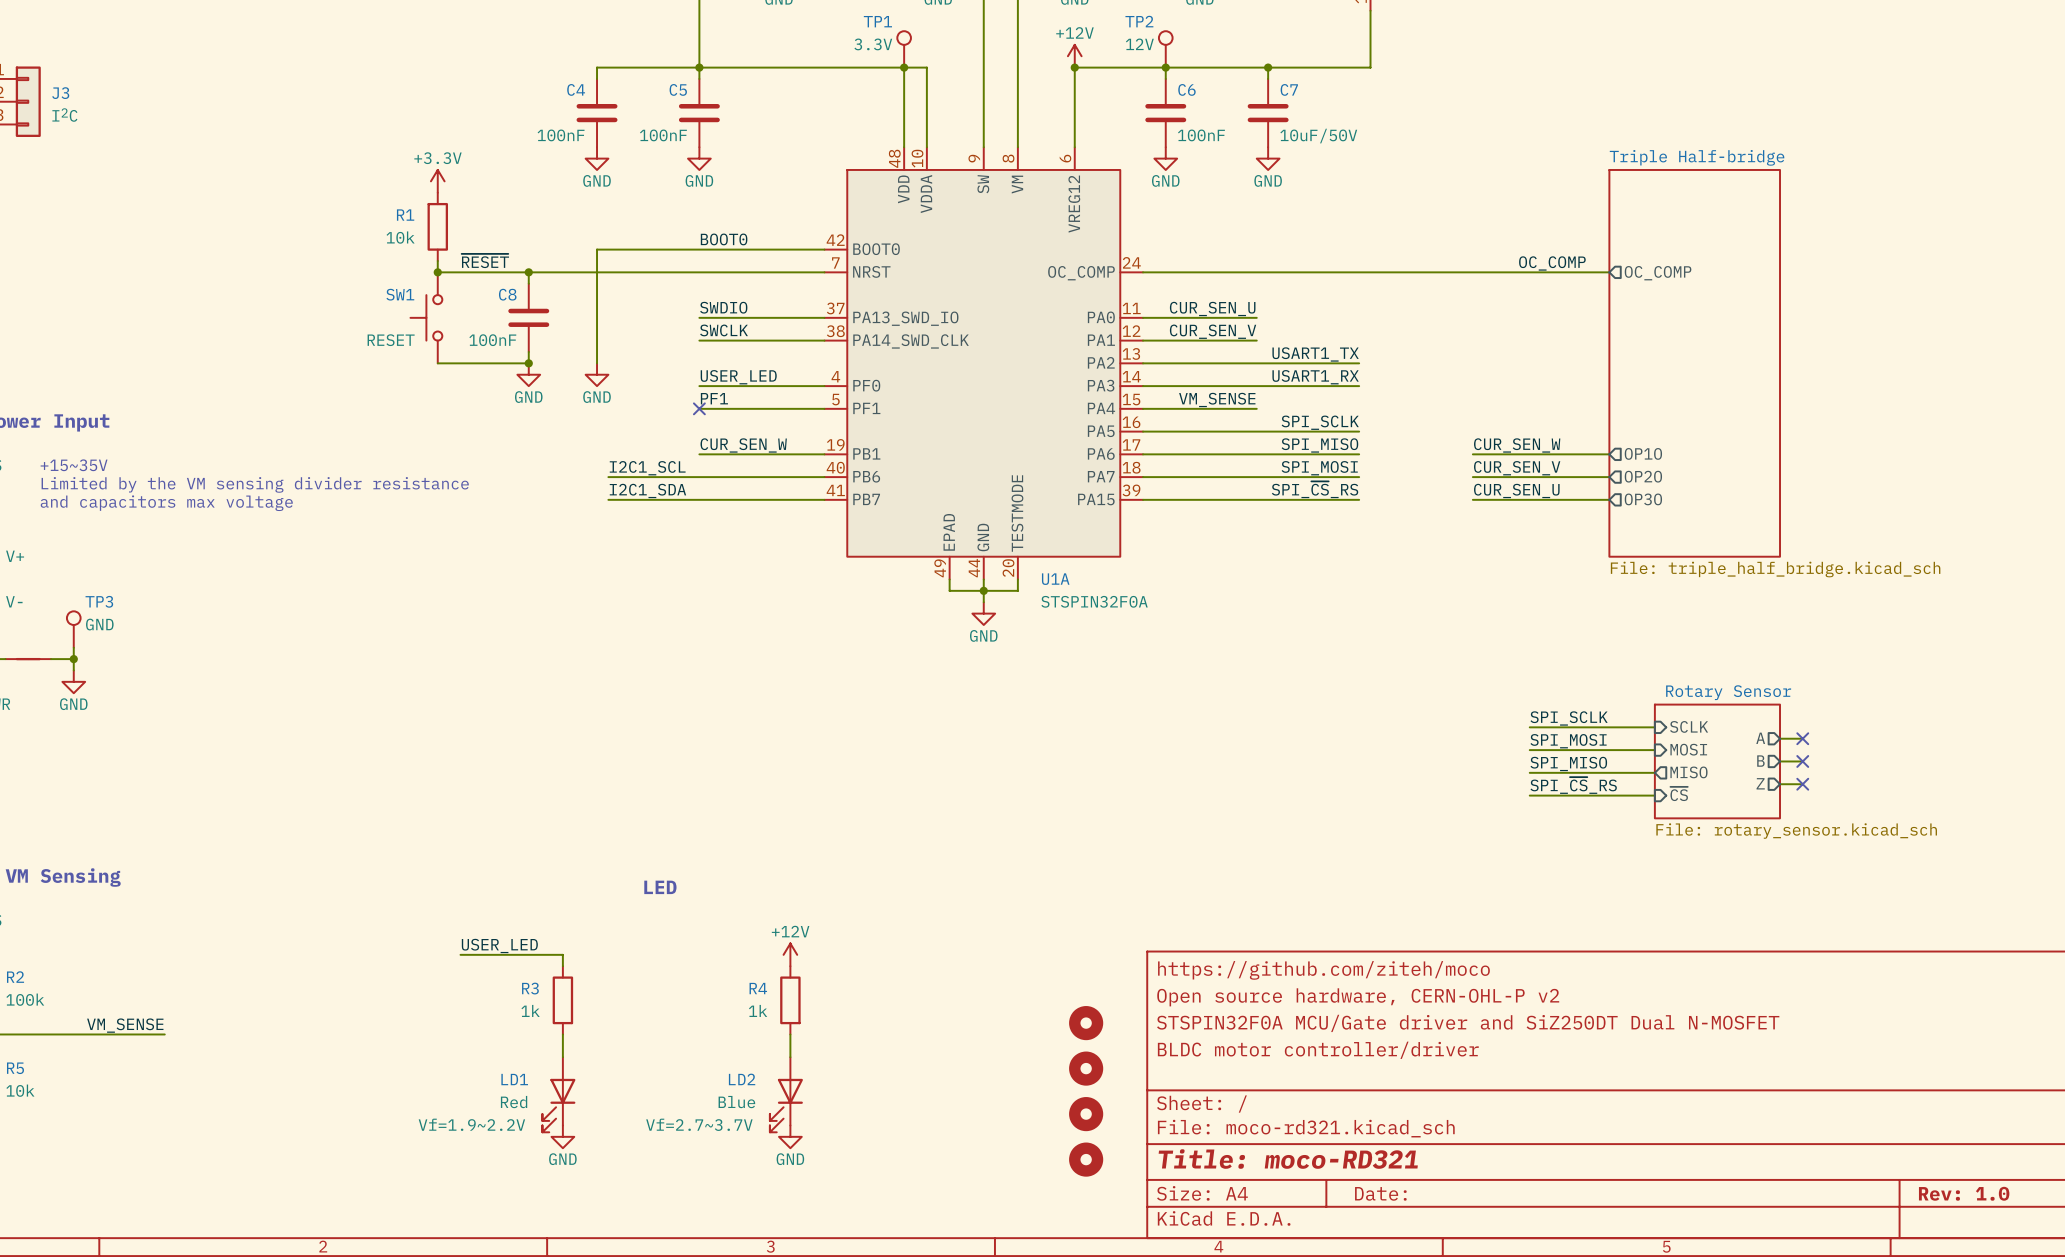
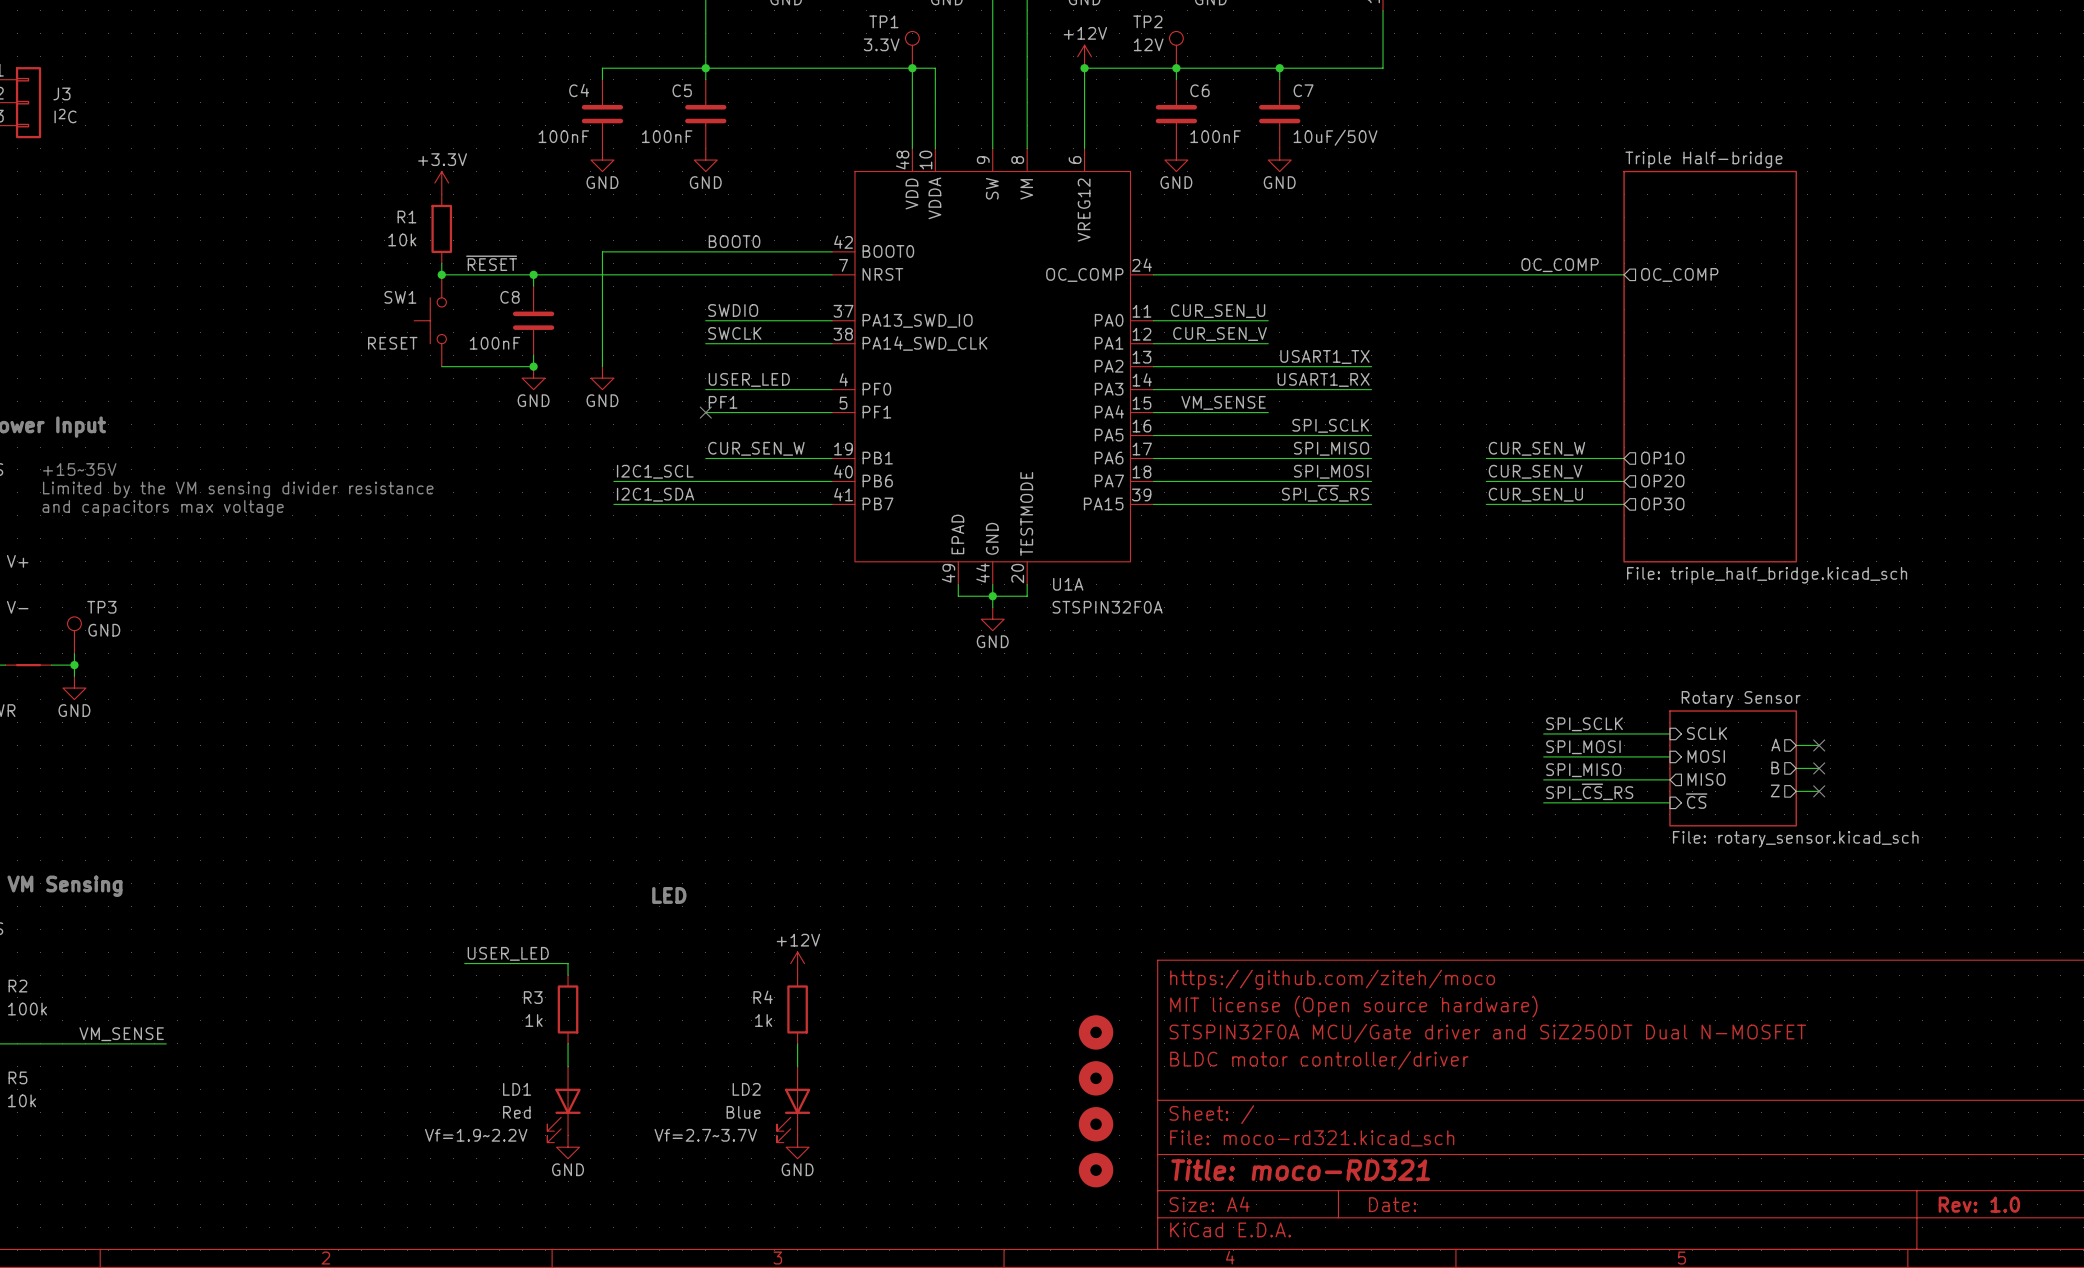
title block: Open source hardware, CERN-OHL-P v2 (1358, 997) -> MIT license (Open source hardware) (1353, 1006)

